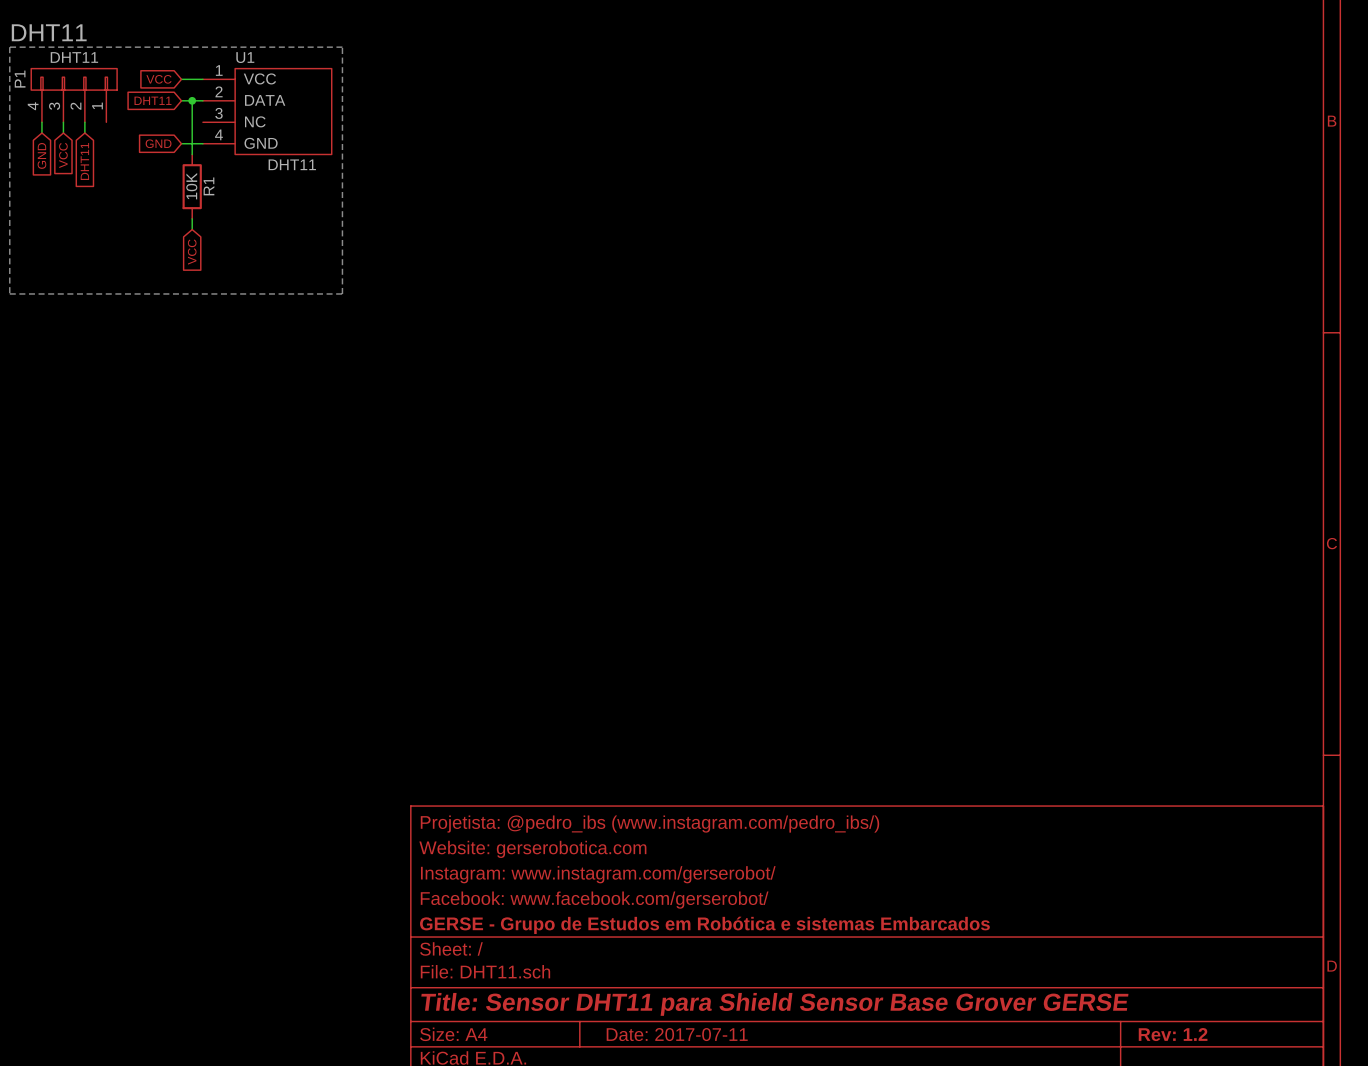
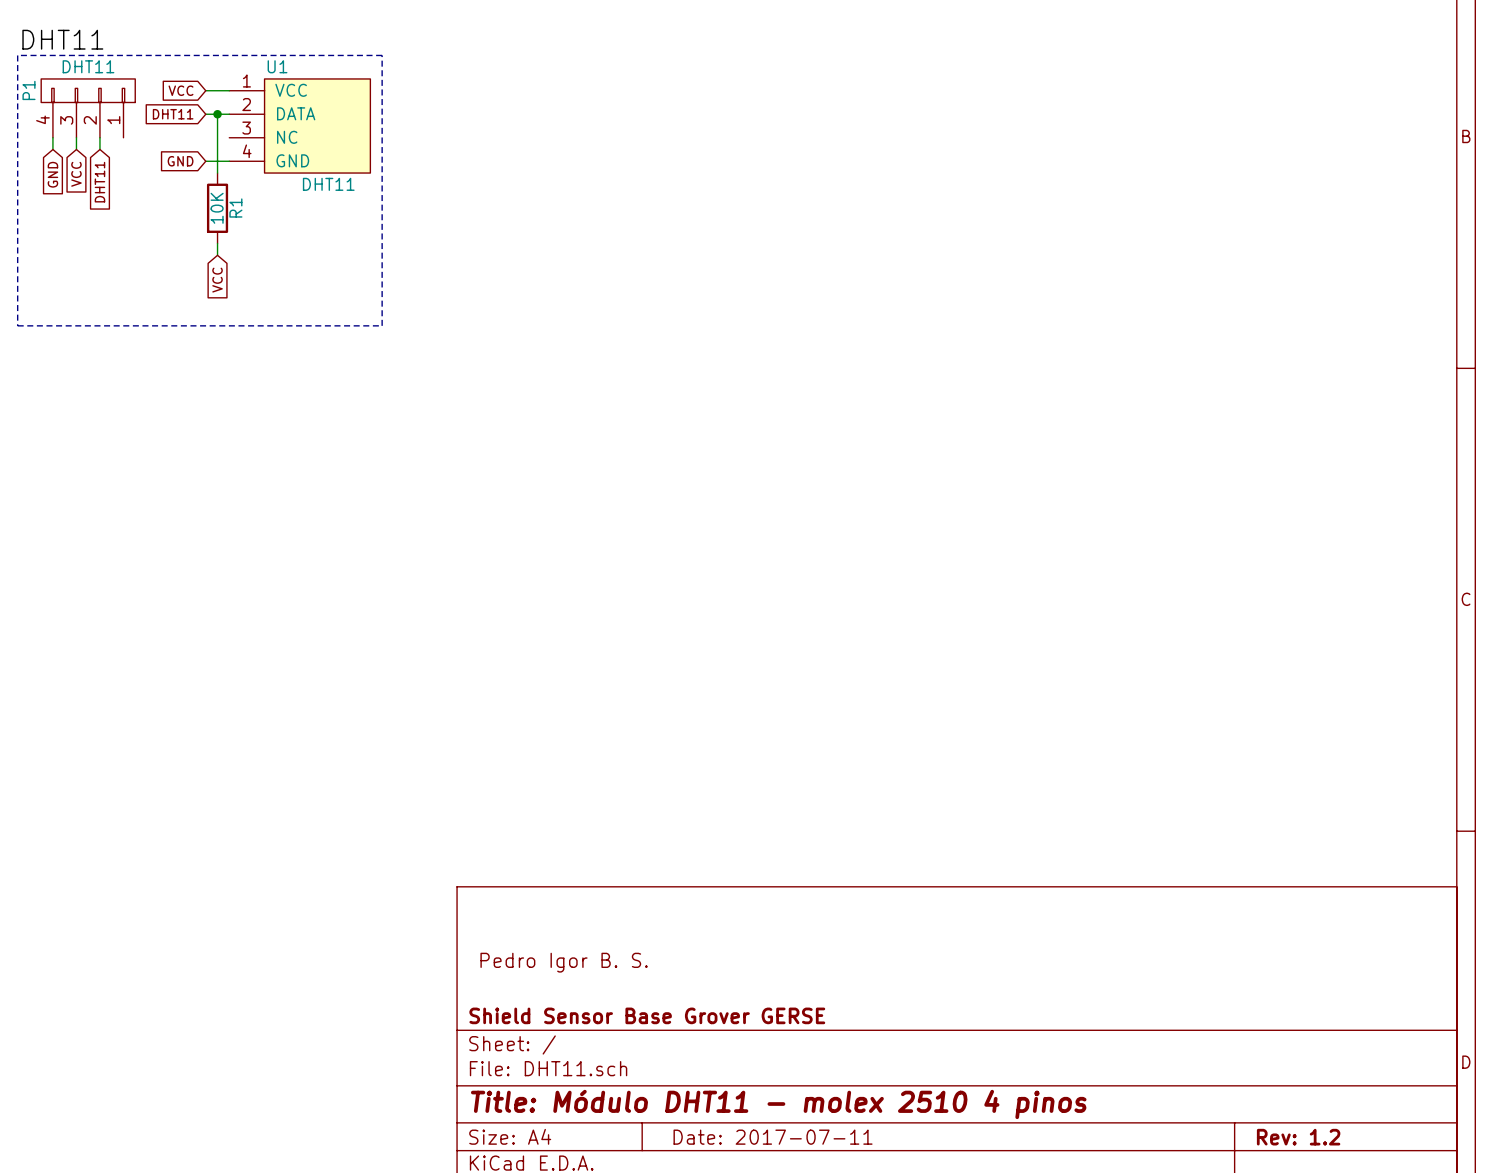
title block: Projetista: @pedro_ibs (www.instagram.com/pedro_ibs/) (649, 824) -> none
title block: Website: gerserobotica.com (532, 849) -> none
title block: Instagram: www.instagram.com/gerserobot/ (598, 874) -> Pedro Igor B. S. (564, 962)
title block: Facebook: www.facebook.com/gerserobot/ (594, 900) -> none
title block: GERSE - Grupo de Estudos em Robótica e sistemas Embarcados (704, 925) -> Shield Sensor Base Grover GERSE (647, 1015)
title block: Title: Sensor DHT11 para Shield Sensor Base Grover GERSE (774, 1004) -> Title: Módulo DHT11 - molex 2510 4 pinos (778, 1104)

